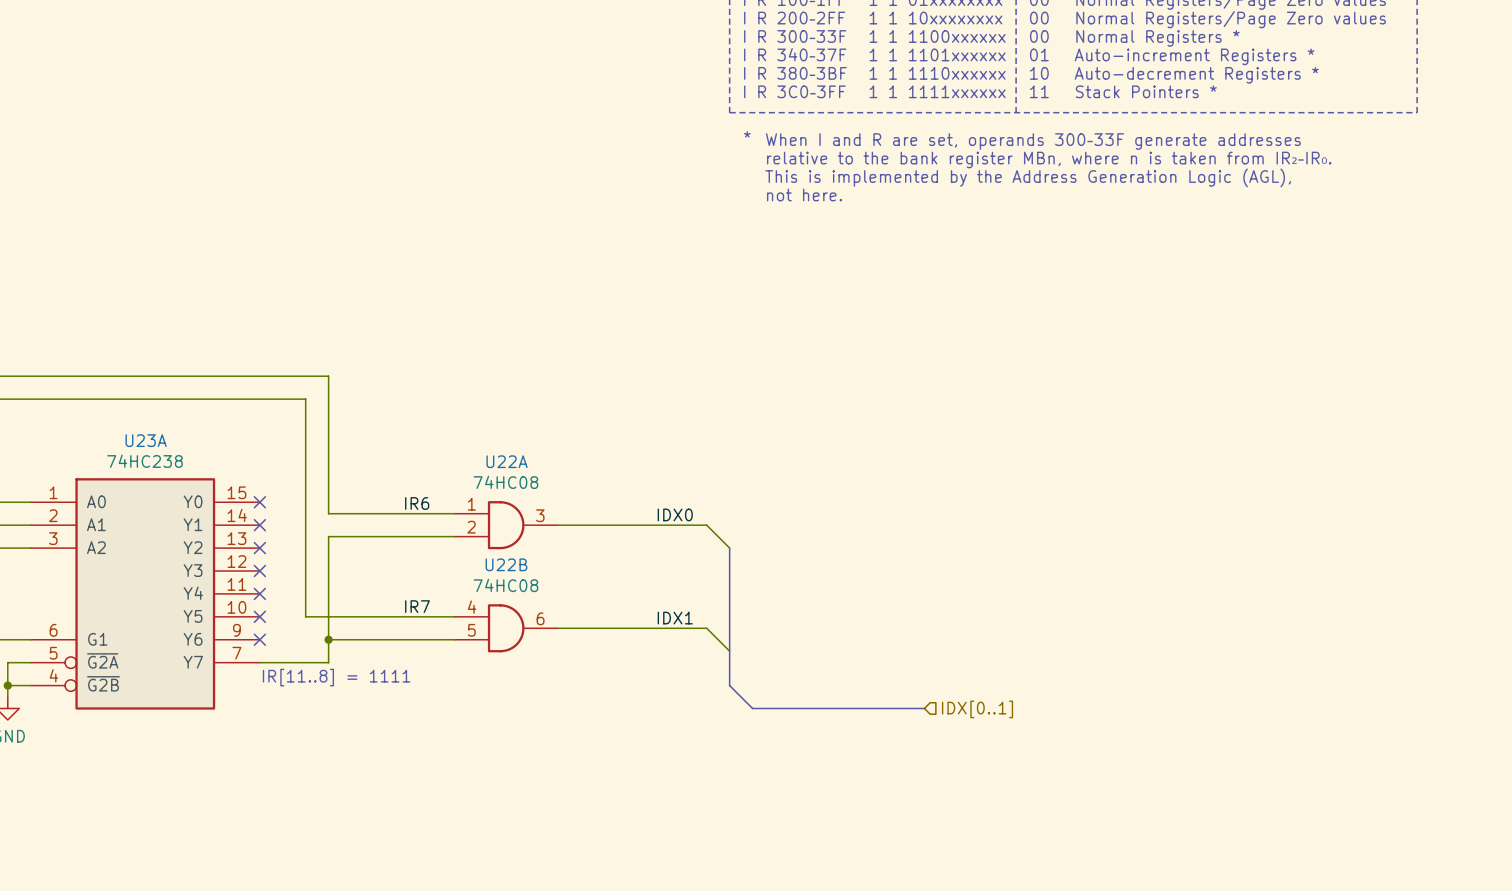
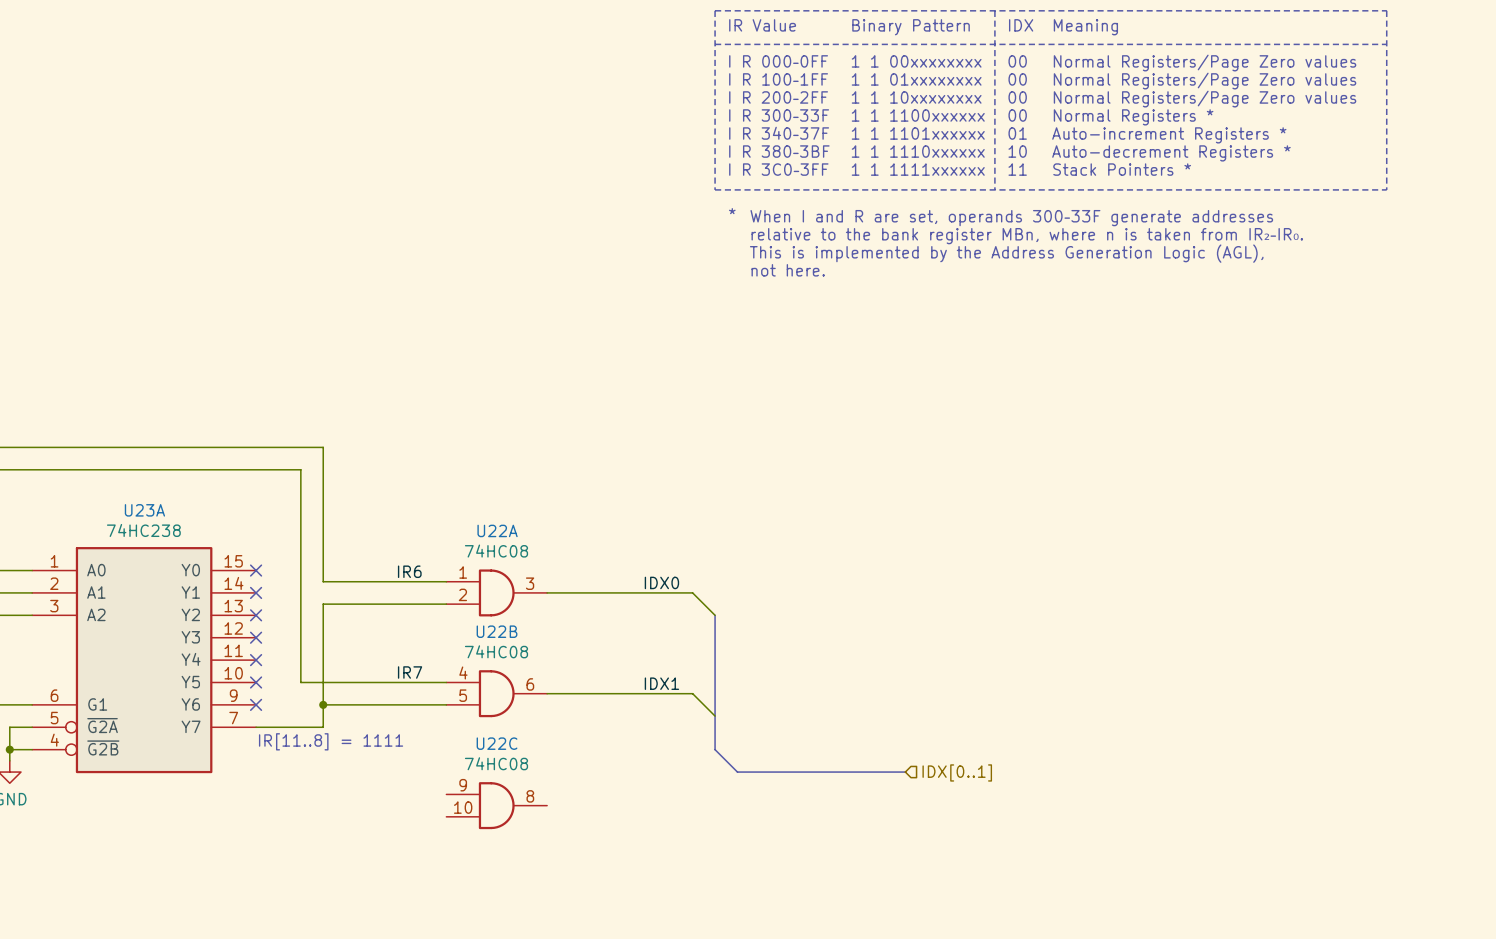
U22C: none -> 74HC08 (496, 805)

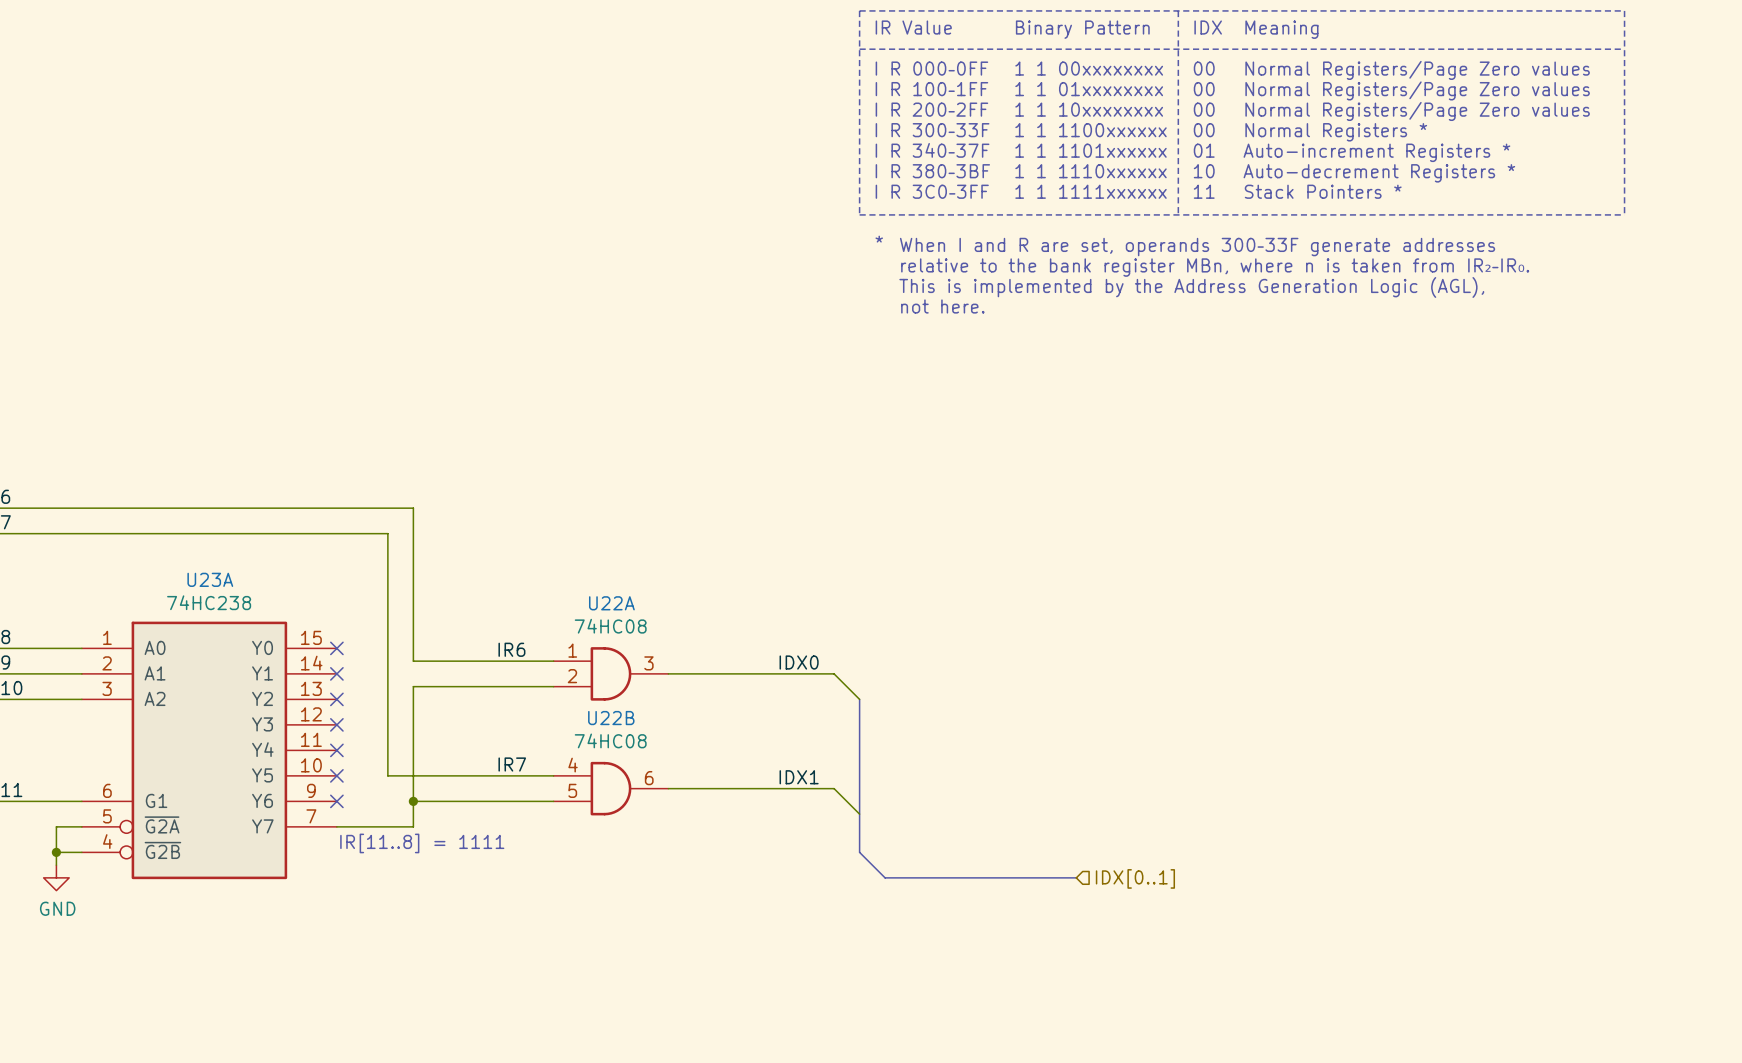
U22C: 74HC08 (496, 805) -> none

